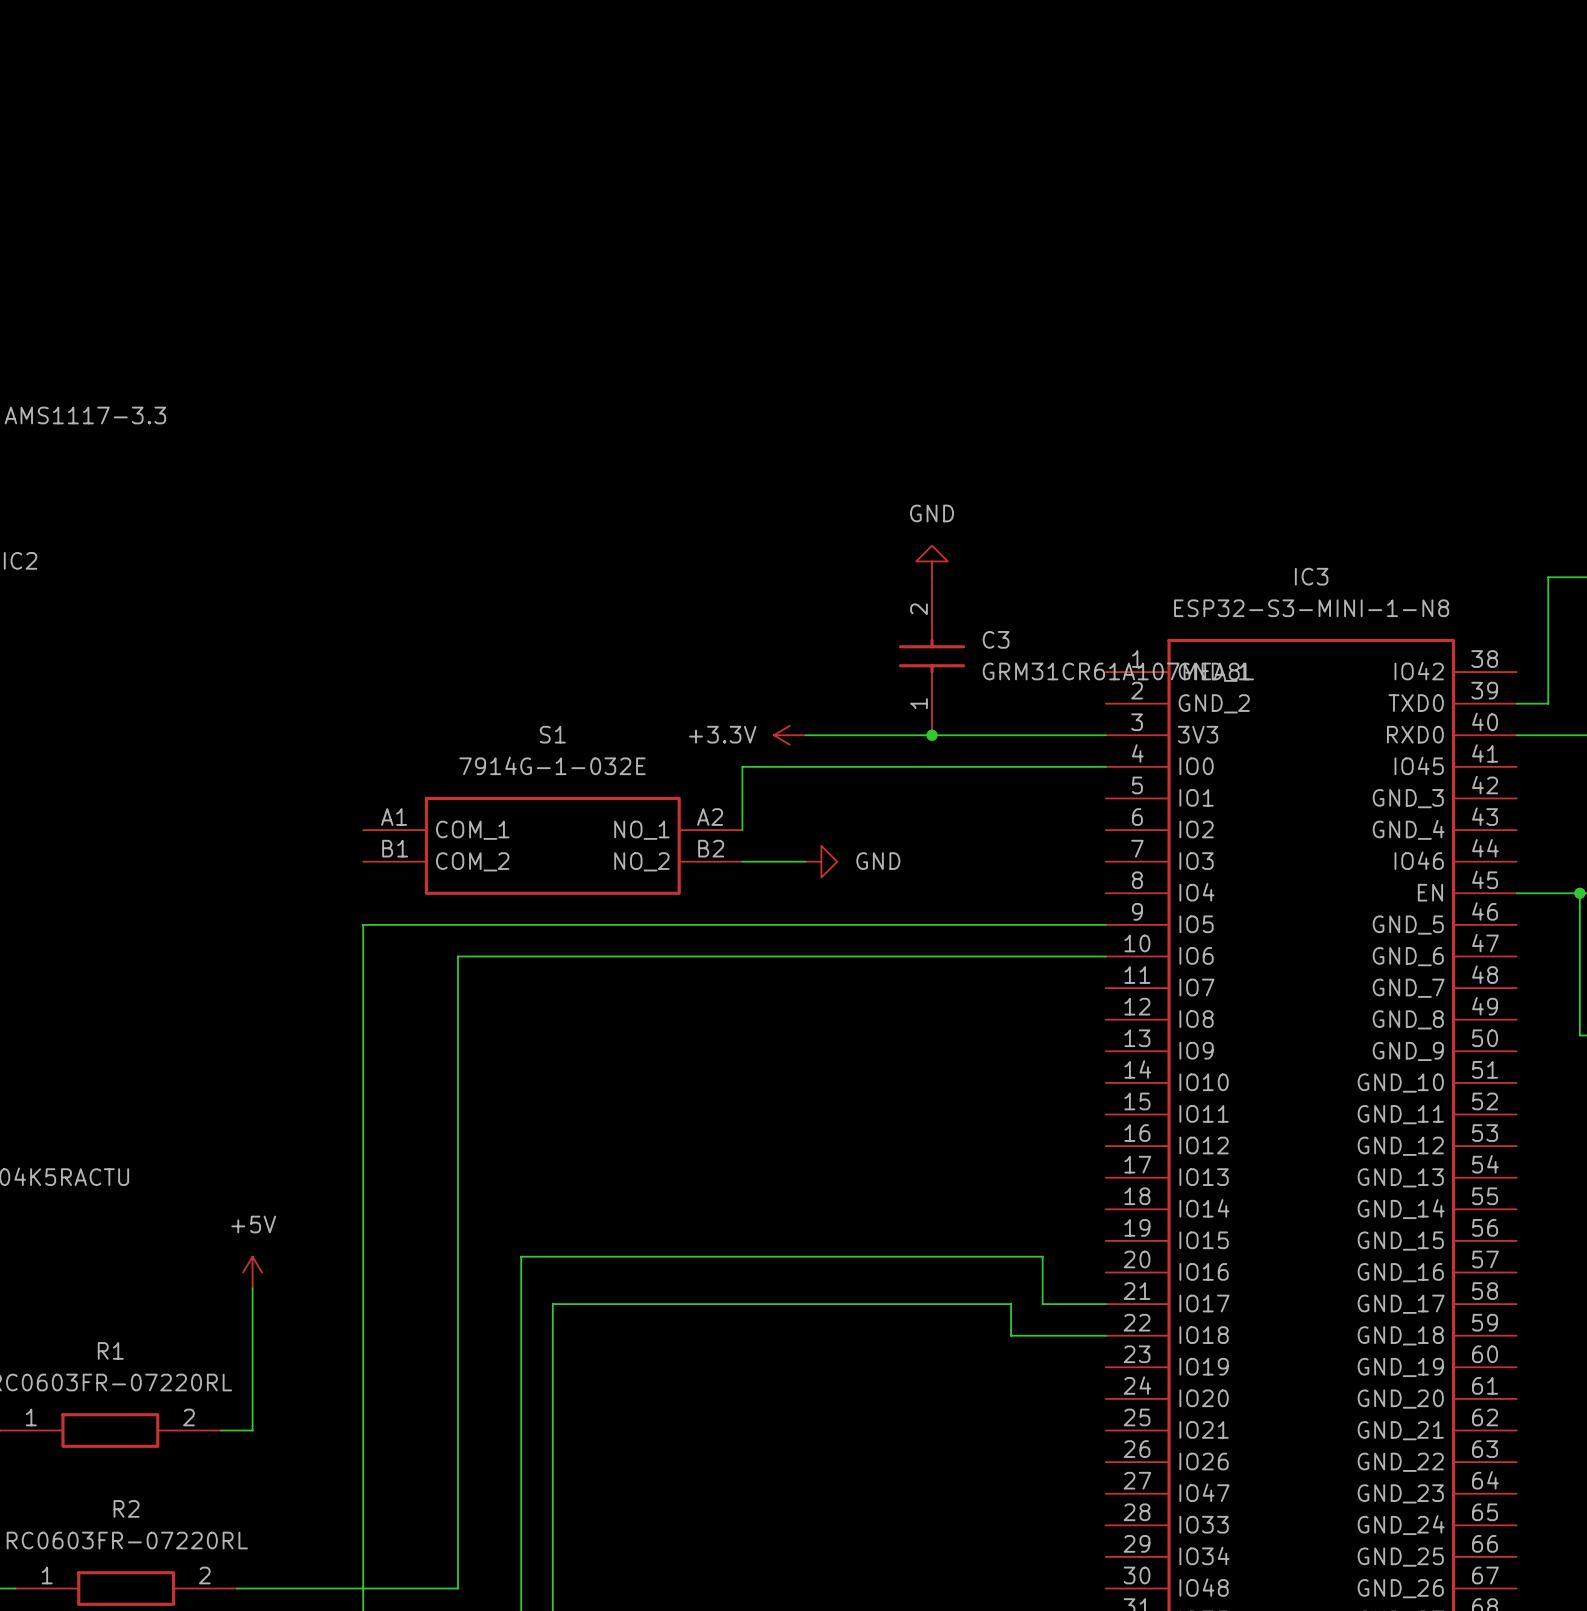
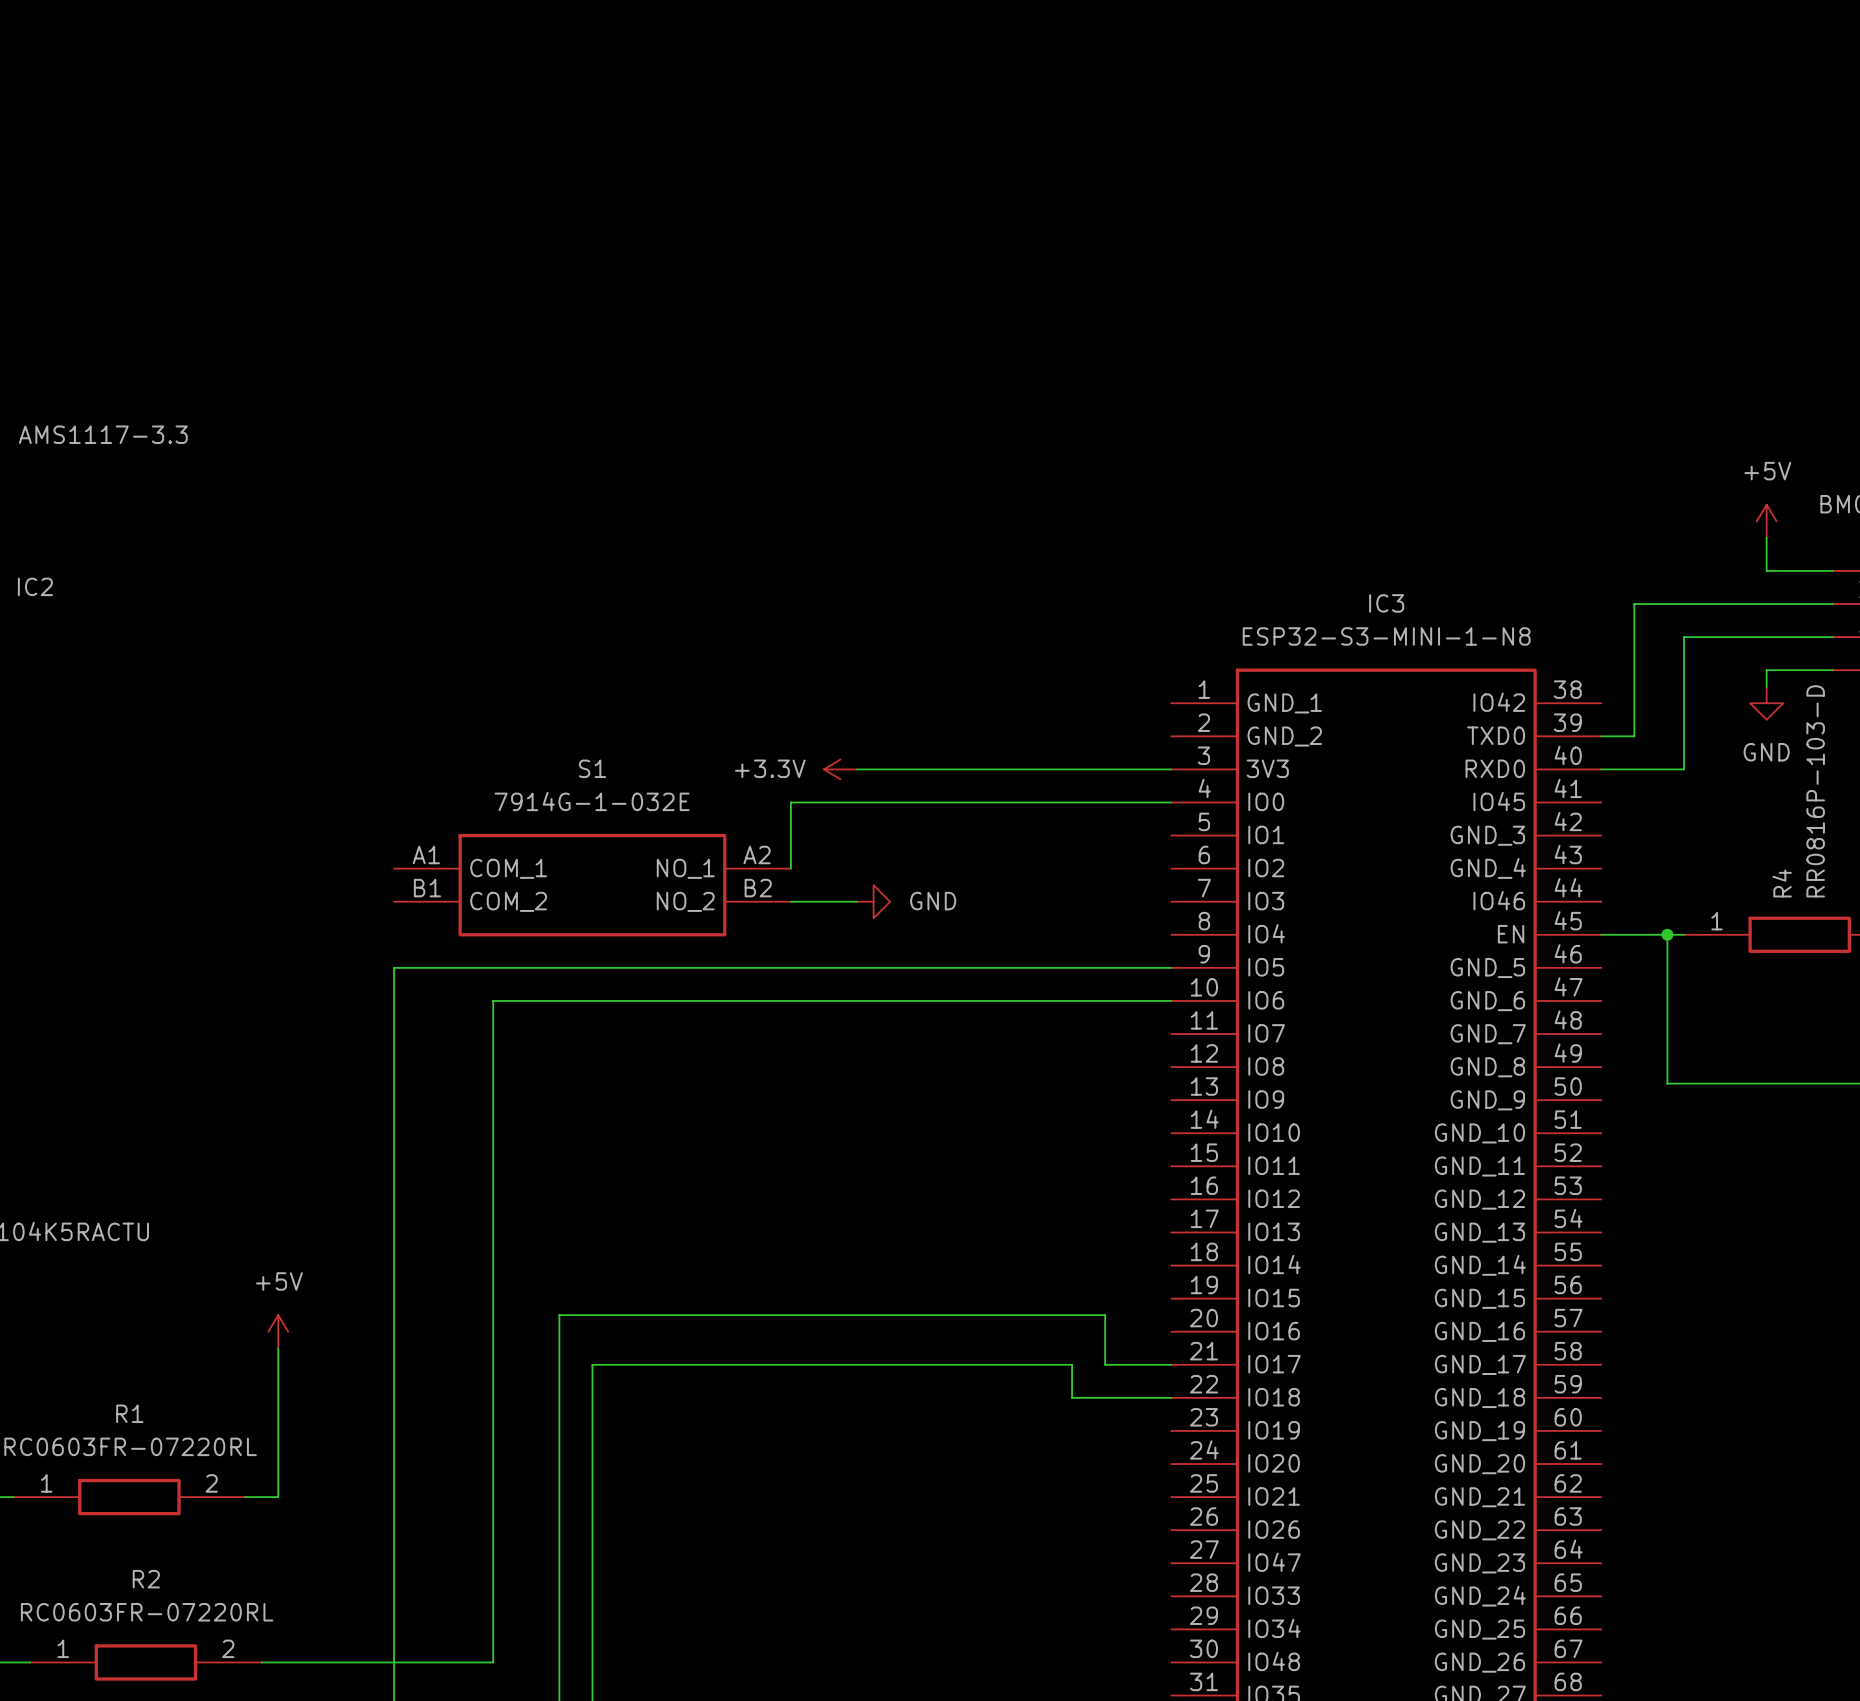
power symbol: GND (932, 561) -> none
C3: GRM31CR61A107MEA8L (932, 656) -> none
junction: (932, 735) -> none

